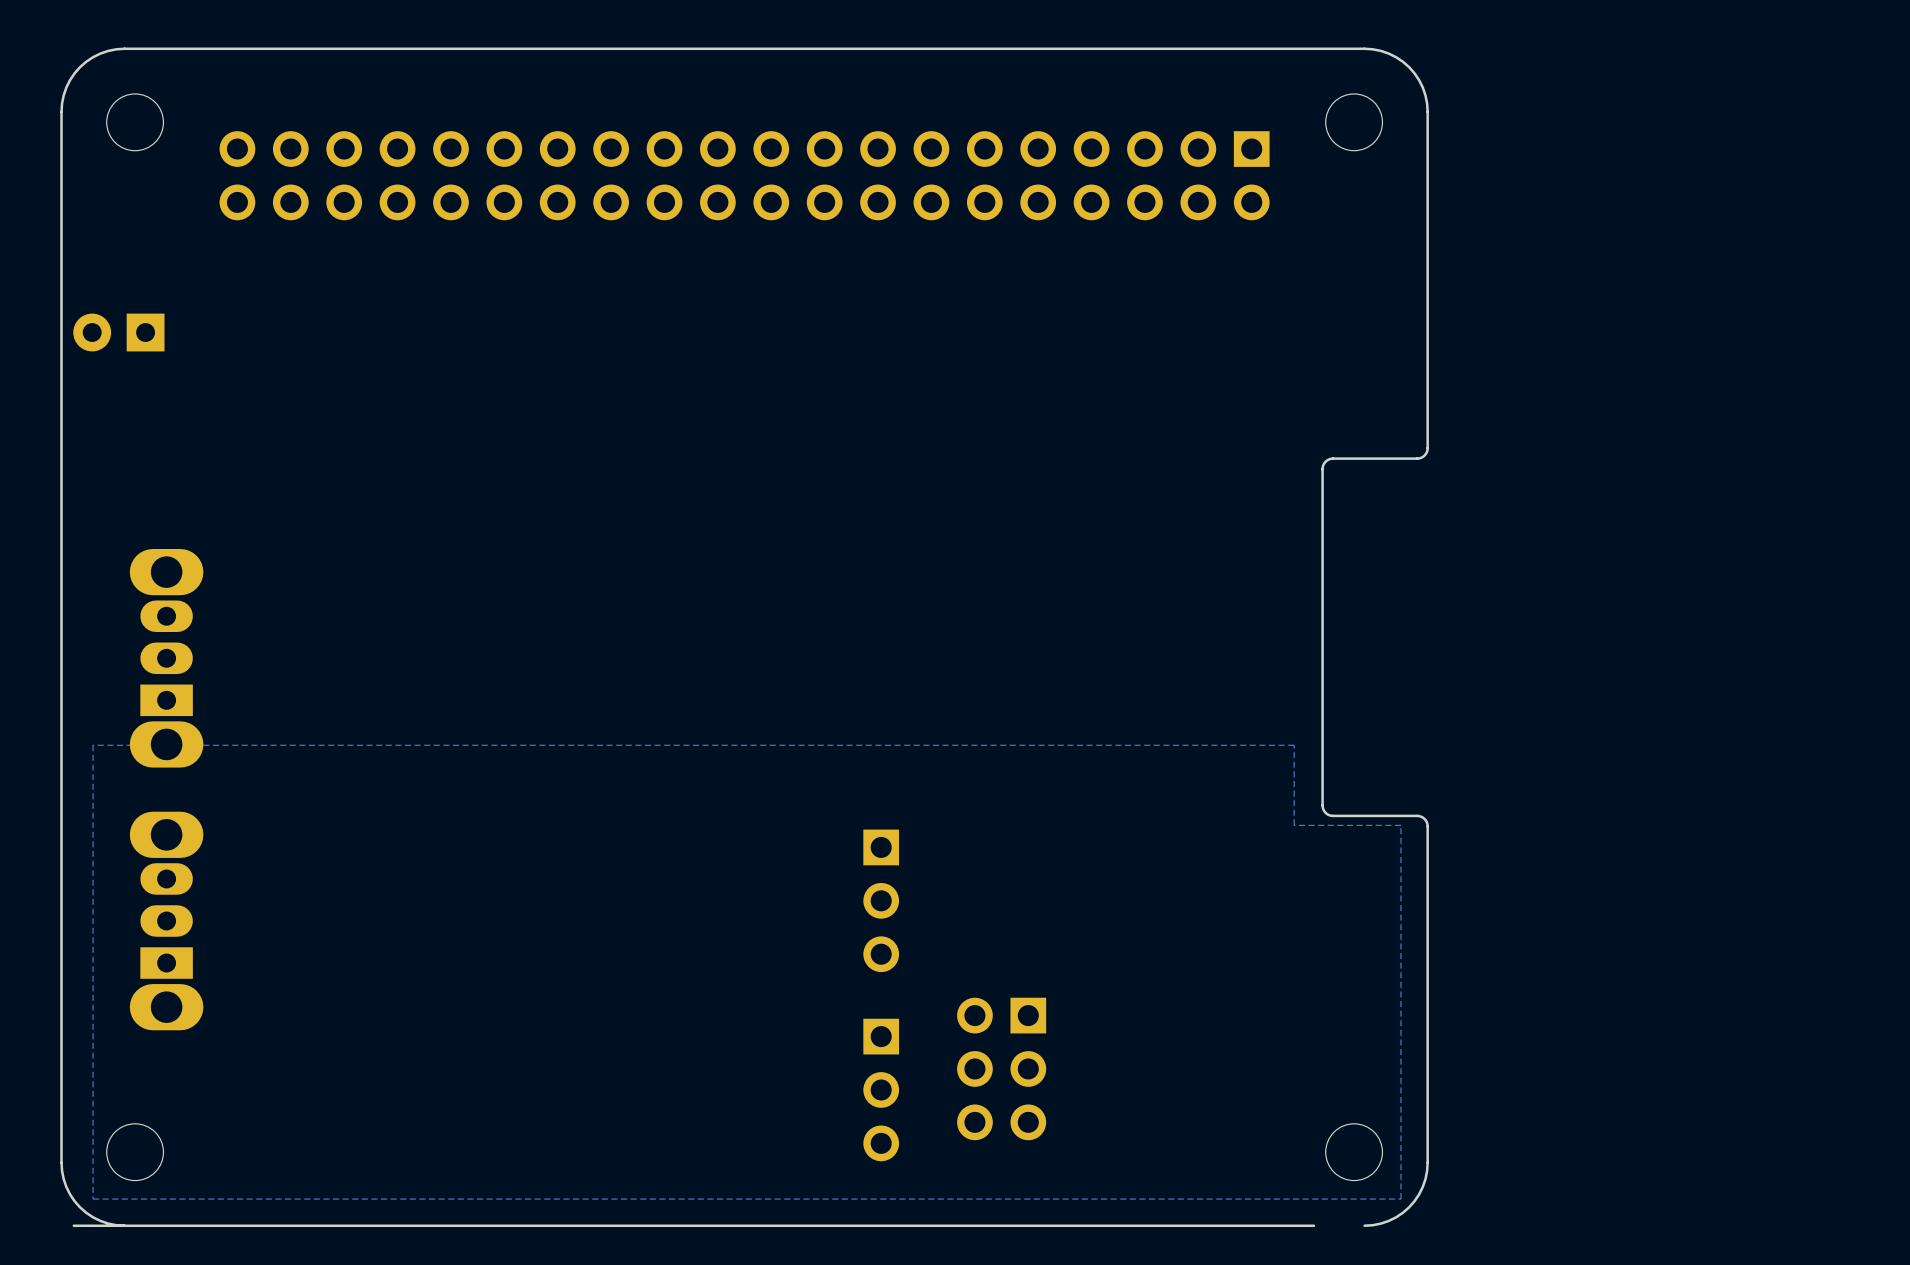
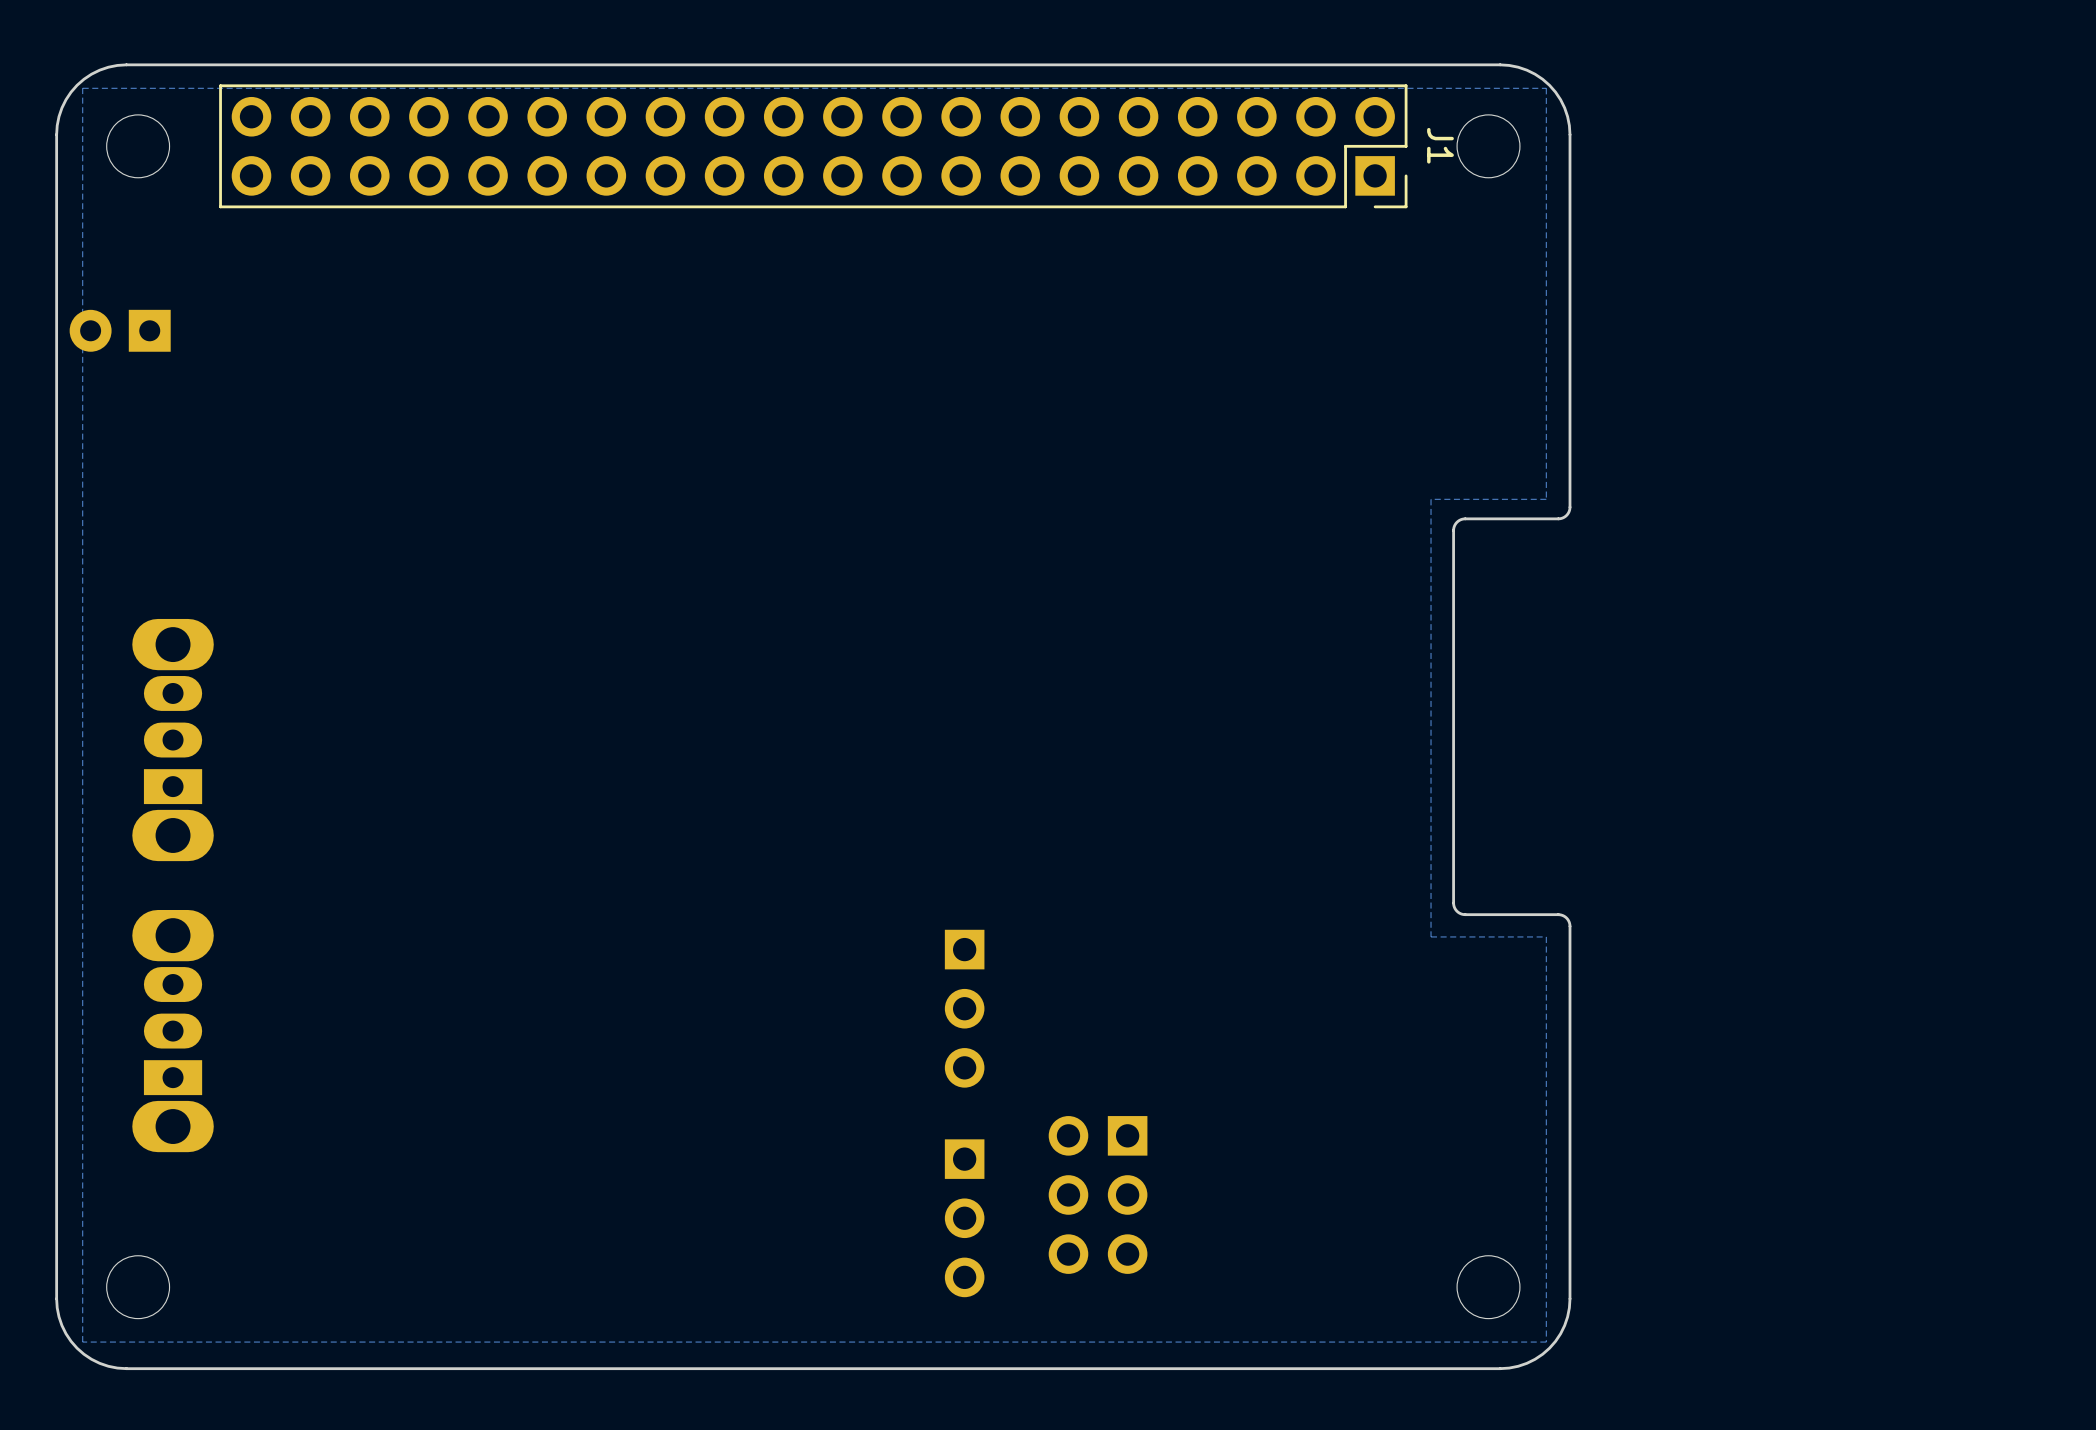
zone outline: none -> (1546, 88) (1546, 499) (1431, 499) (1431, 936) (1546, 936) (1546, 1342) (82, 1342) (82, 88) (1546, 88)
J1 side: top (744, 175) -> bottom (813, 146)
part position: (118, 332) -> (120, 330)
zone outline: (1294, 745) (1294, 825) (1400, 825) (1400, 1199) (93, 1199) (93, 745) (1294, 745) -> none
board edge: (124, 1225) (73, 1225) -> none
board edge: none -> (1500, 1368) (1443, 1368)

